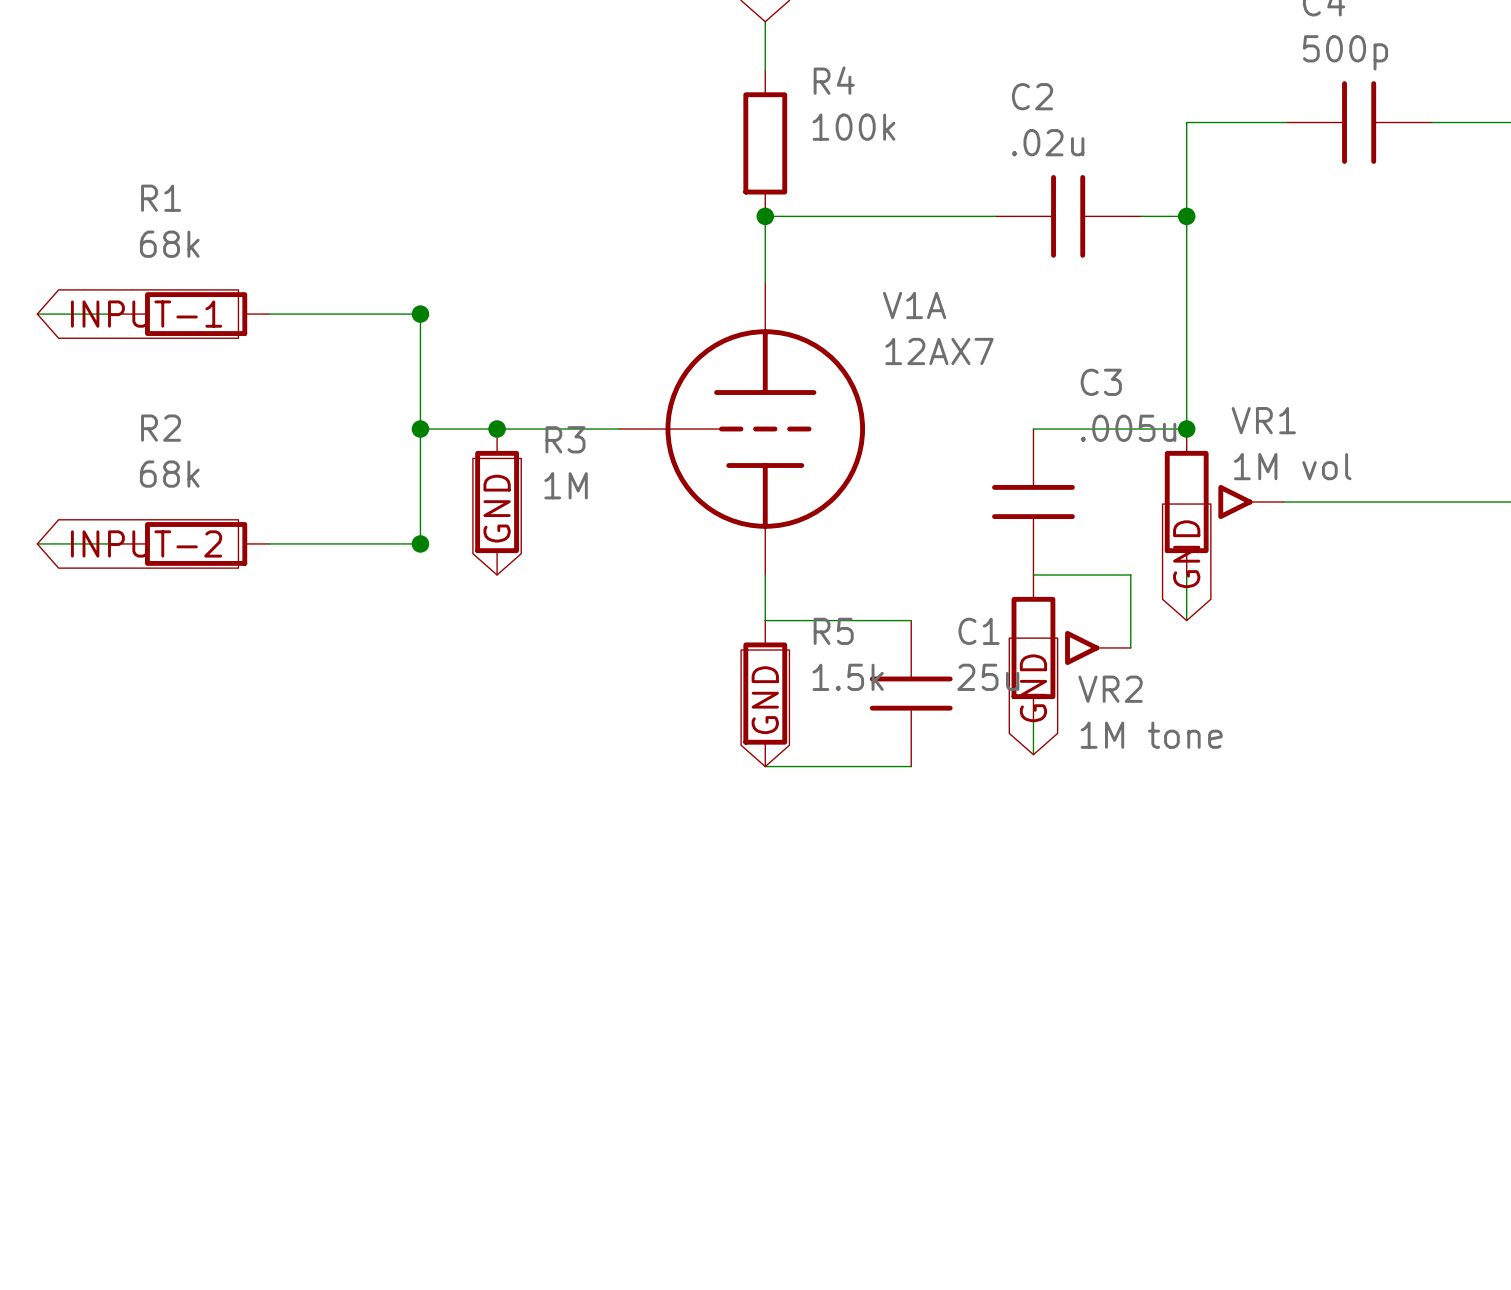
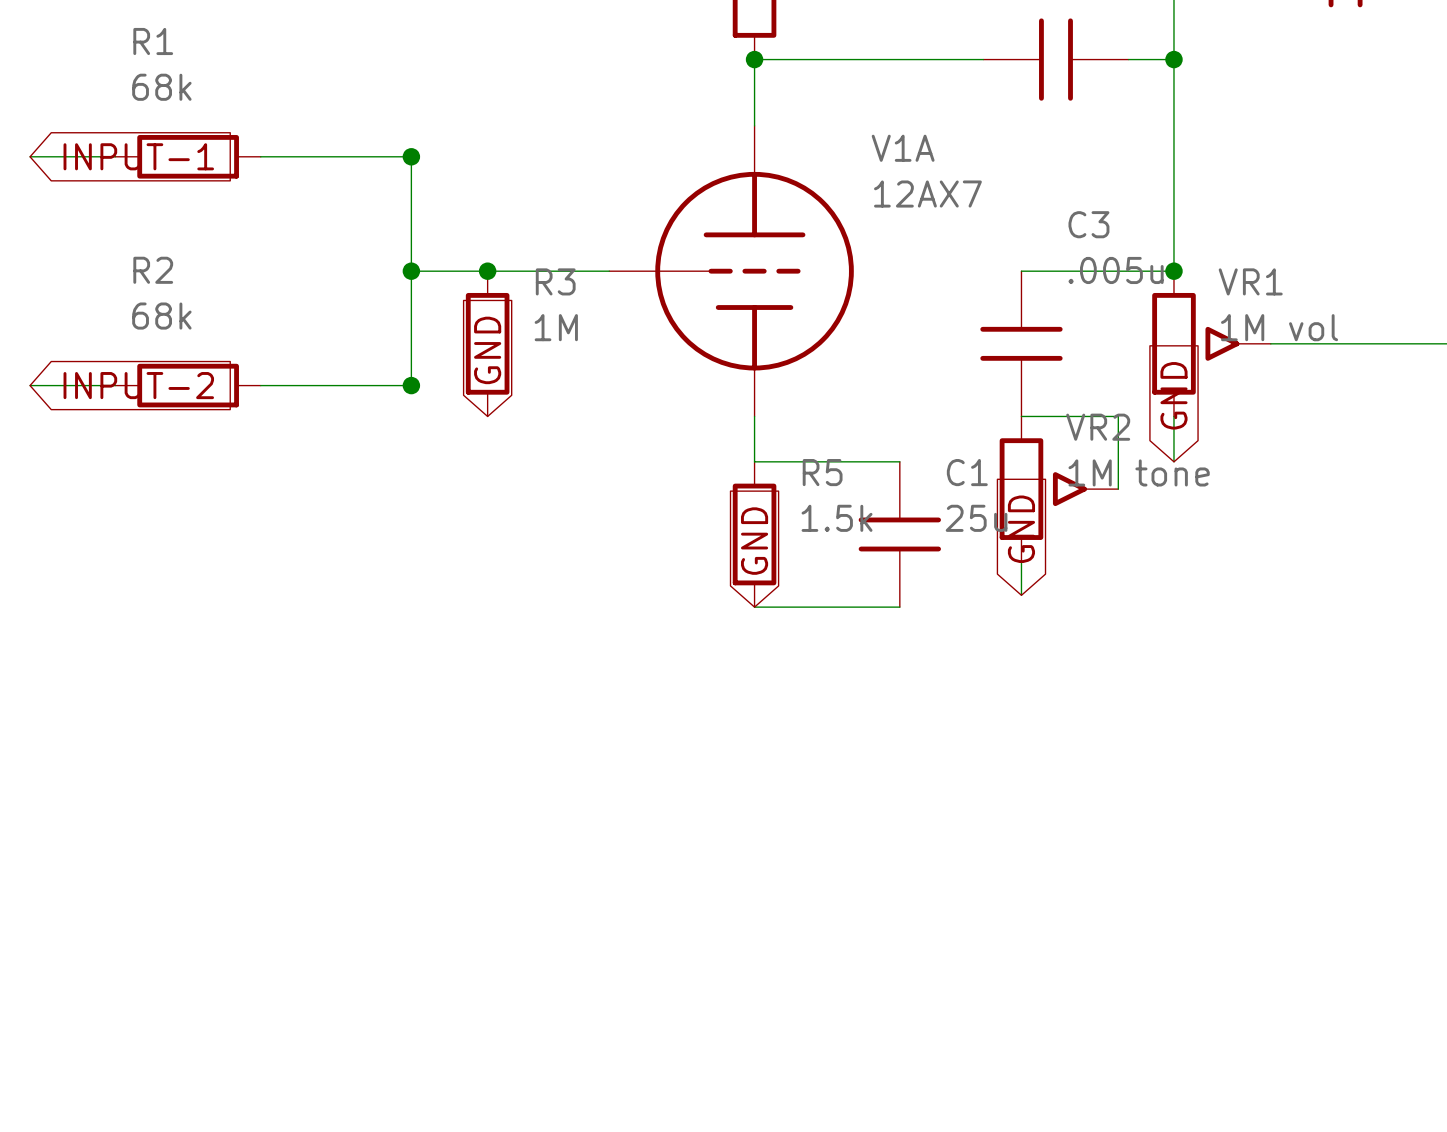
VR1 name position: VR1 (1263, 420) -> VR1 (1250, 281)
VR1 value position: 1M vol (1292, 466) -> 1M vol (1279, 327)
VR2 name position: VR2 (1110, 689) -> VR2 (1098, 427)
VR2 value position: 1M tone (1151, 735) -> 1M tone (1139, 472)

